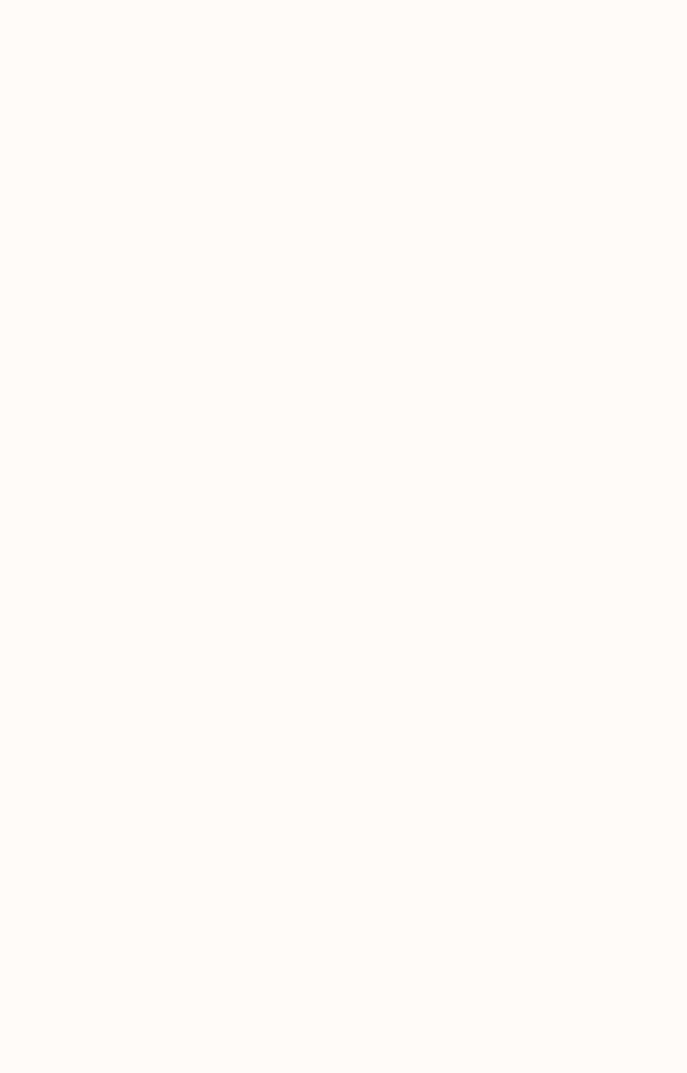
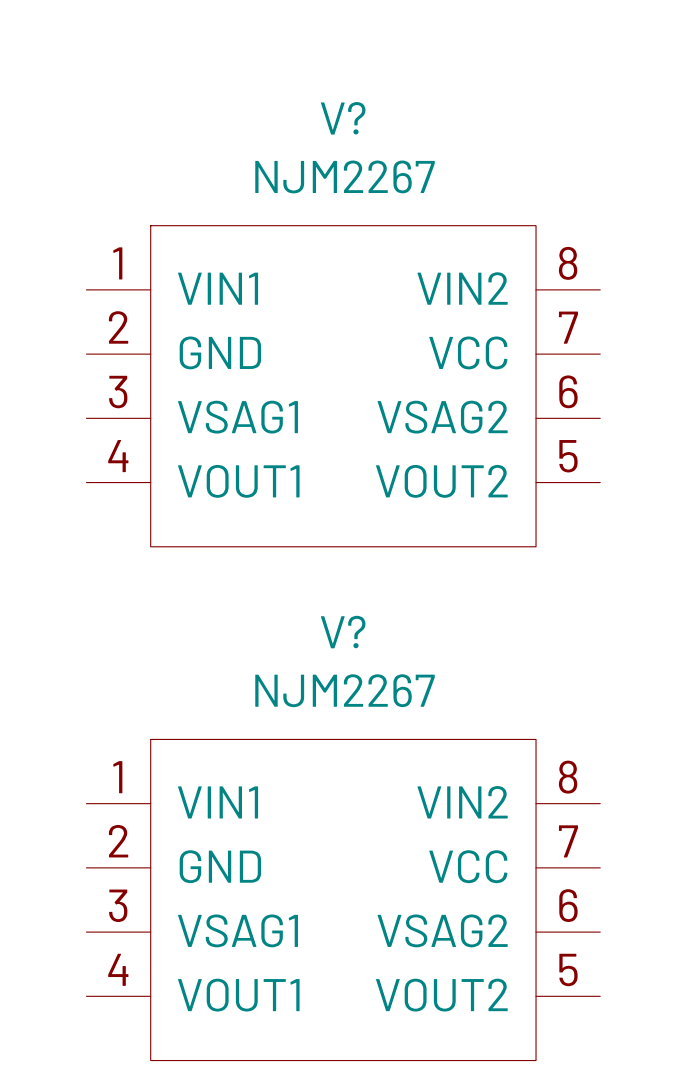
V?: none -> NJM2267 (343, 386)
V?: none -> NJM2267 (343, 899)

